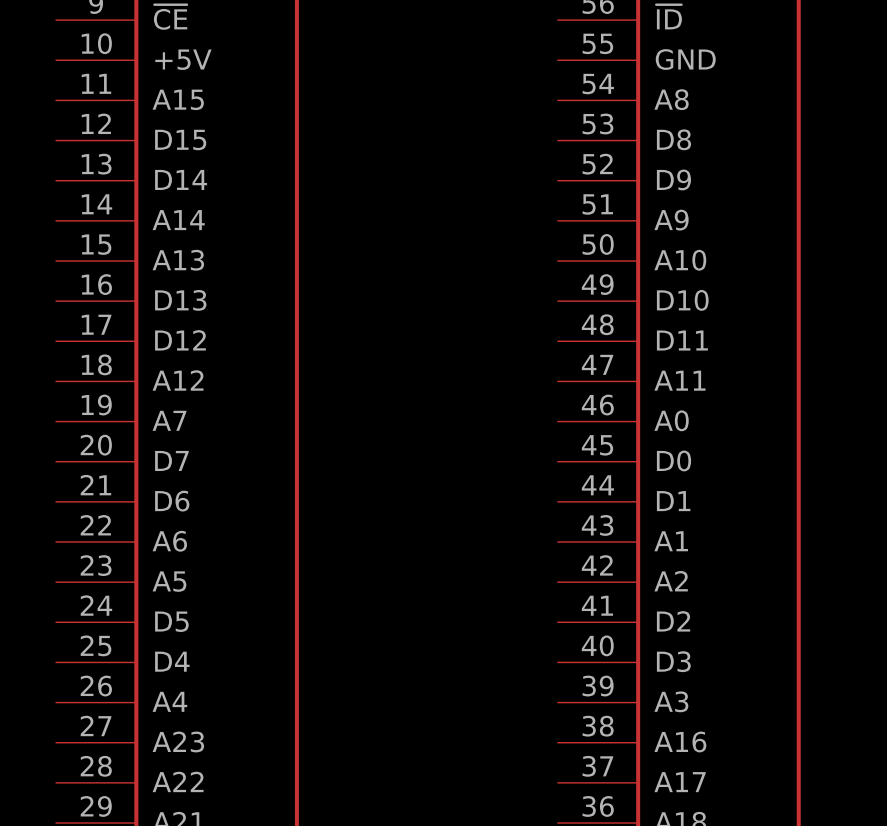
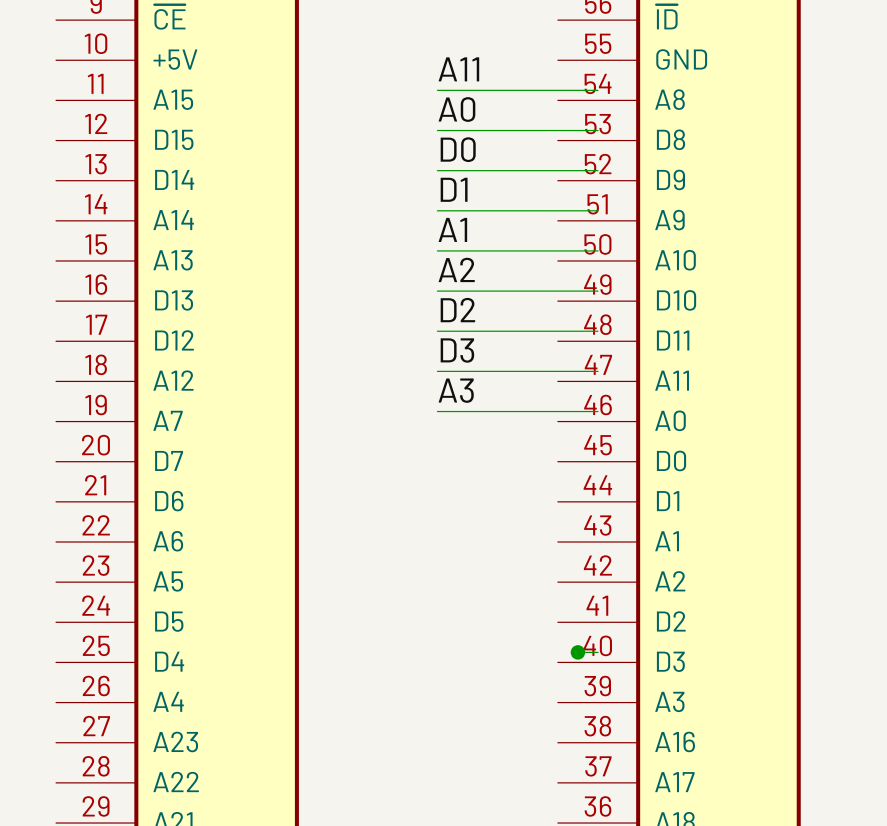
label: none -> A11 (458, 69)
wire: none -> (437, 90) (598, 90)
label: none -> A0 (456, 109)
wire: none -> (437, 130) (598, 130)
label: none -> D0 (458, 149)
wire: none -> (437, 170) (598, 170)
label: none -> D1 (454, 189)
wire: none -> (437, 210) (598, 210)
label: none -> A1 (452, 229)
wire: none -> (437, 250) (598, 250)
label: none -> A2 (456, 269)
wire: none -> (437, 291) (598, 291)
label: none -> D2 (457, 310)
wire: none -> (437, 331) (598, 331)
label: none -> D3 (457, 350)
wire: none -> (437, 371) (598, 371)
label: none -> A3 (456, 390)
wire: none -> (437, 411) (598, 411)
wire: none -> (577, 652) (598, 652)
junction: none -> (577, 652)

